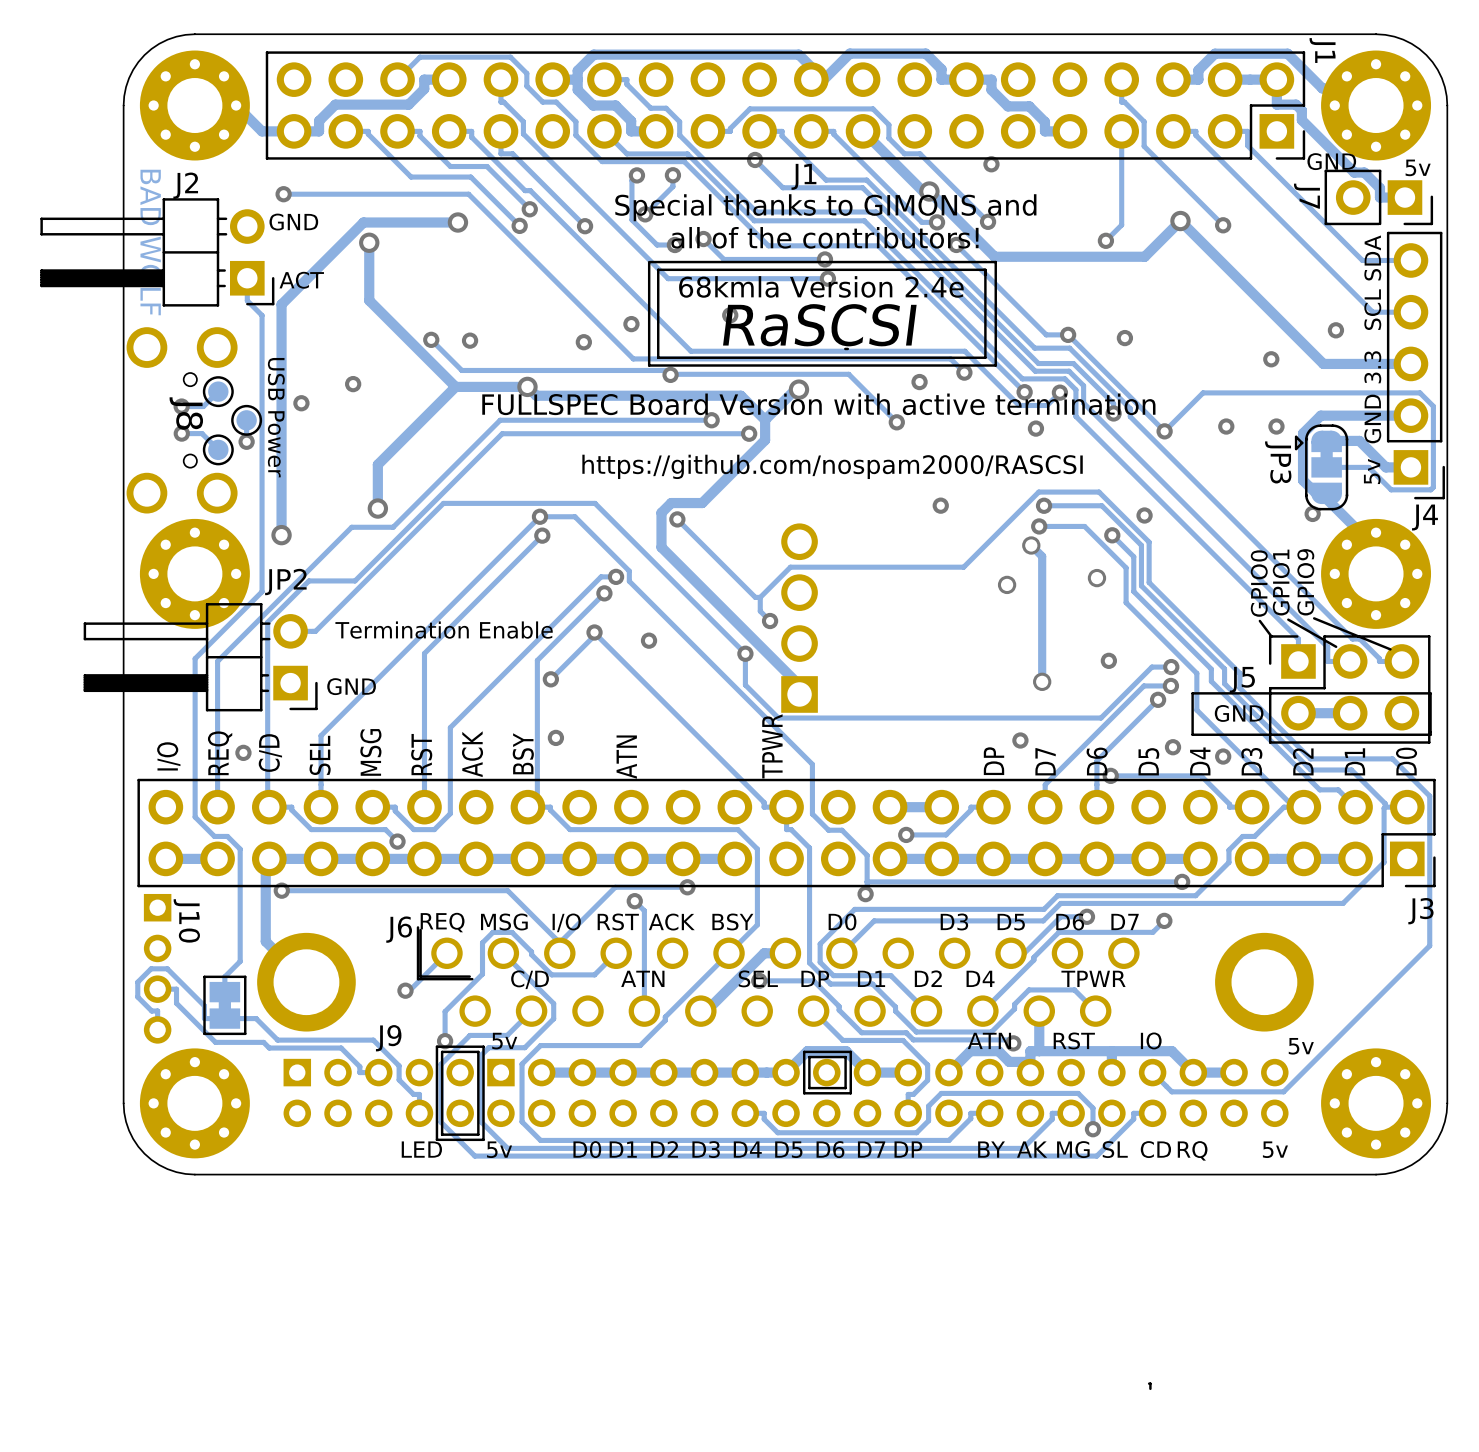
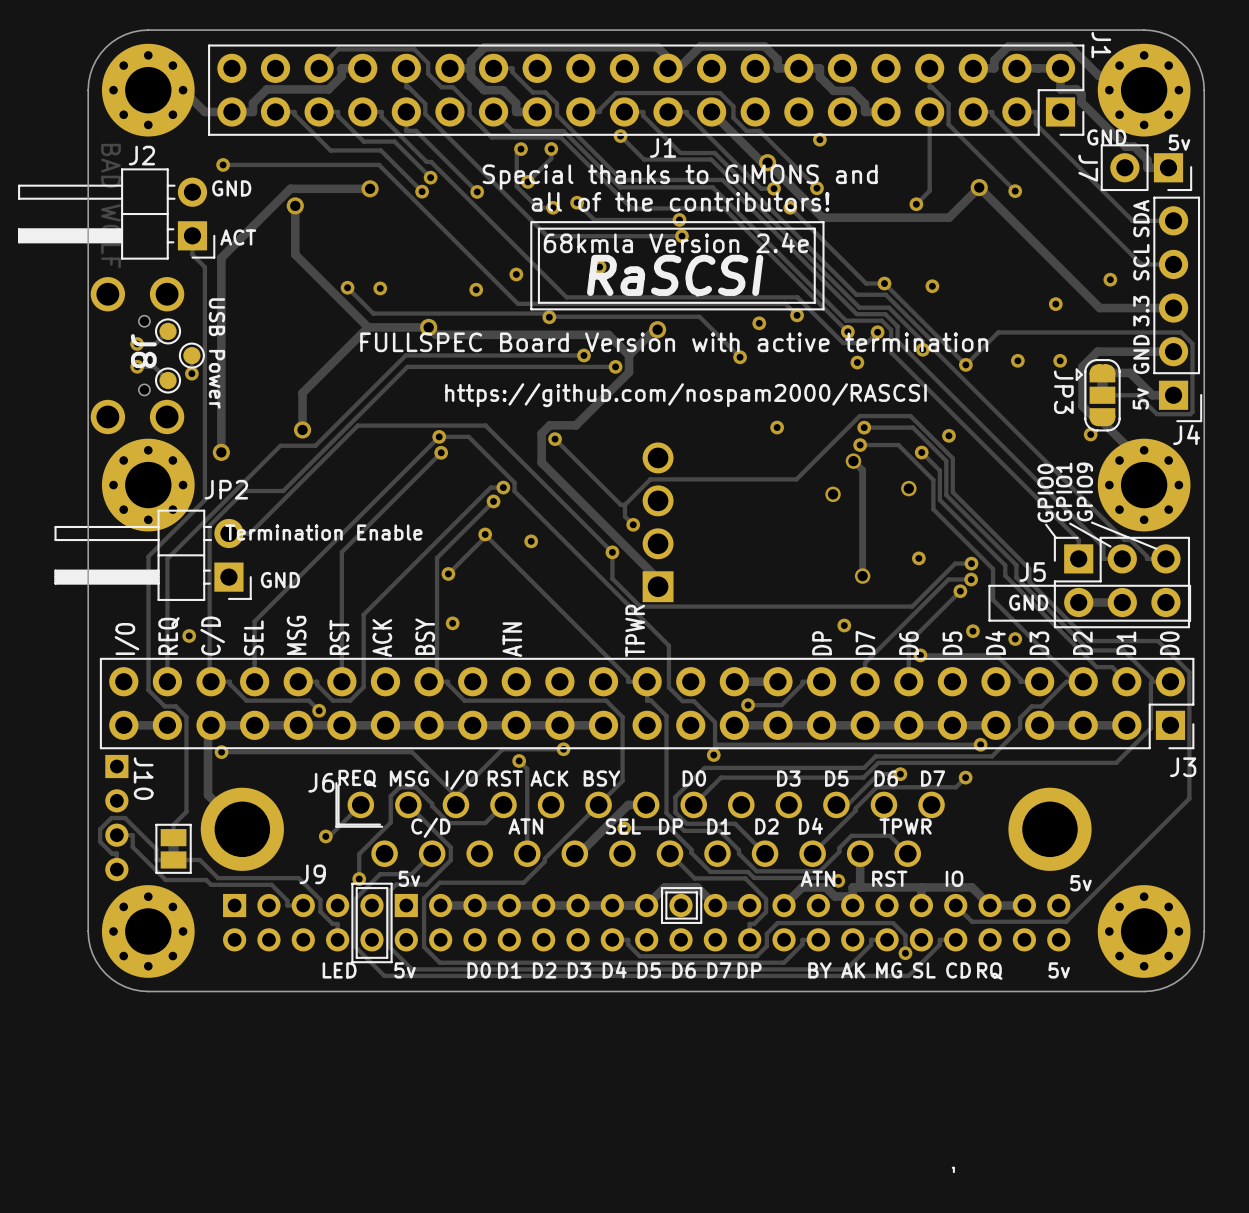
via: (353, 384) -> none
via: (301, 403) -> none
text position: Termination Enable (444, 630) -> Termination Enable (323, 532)

